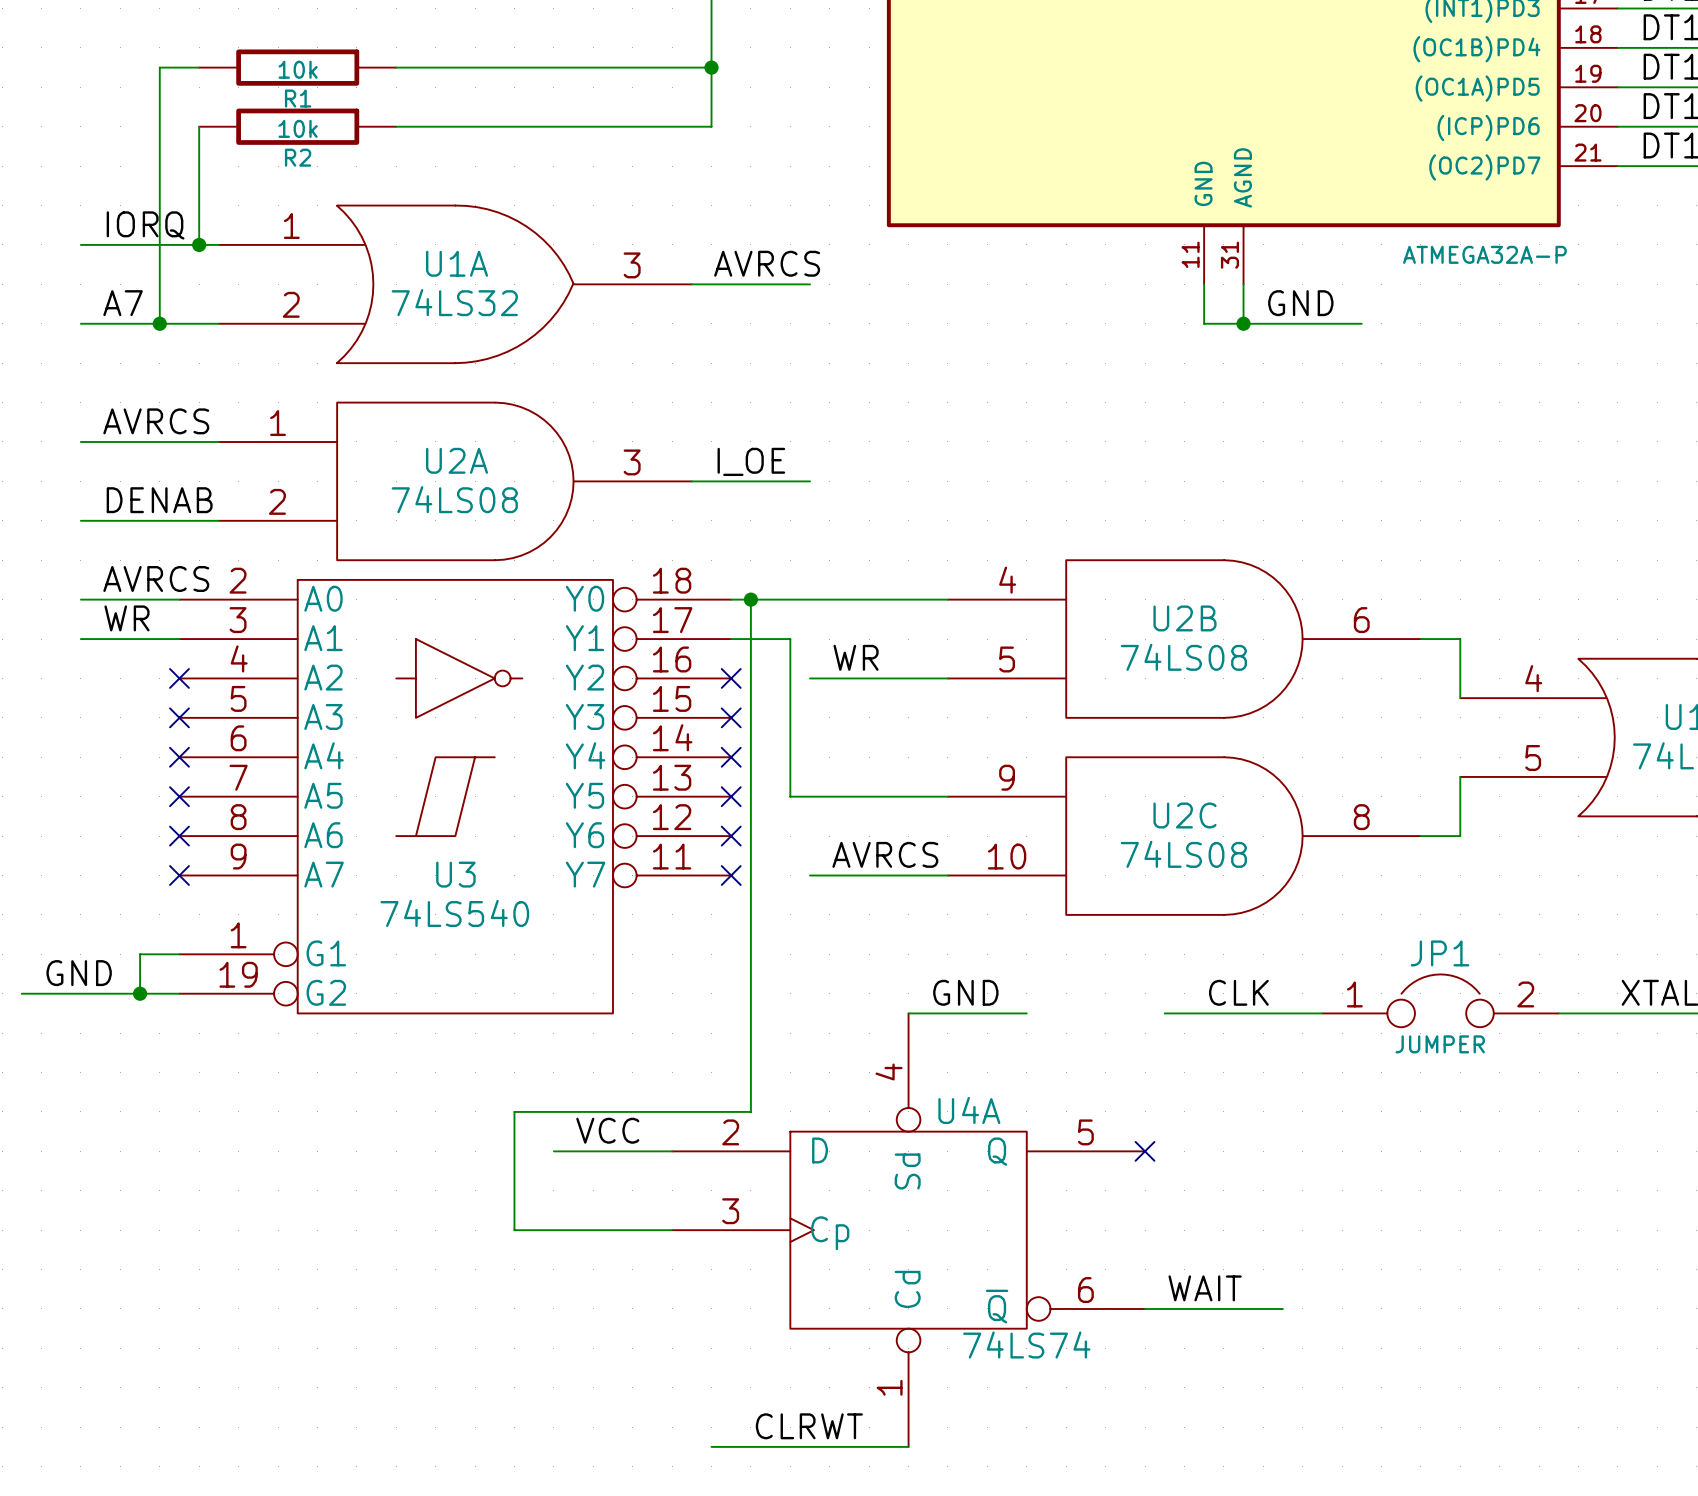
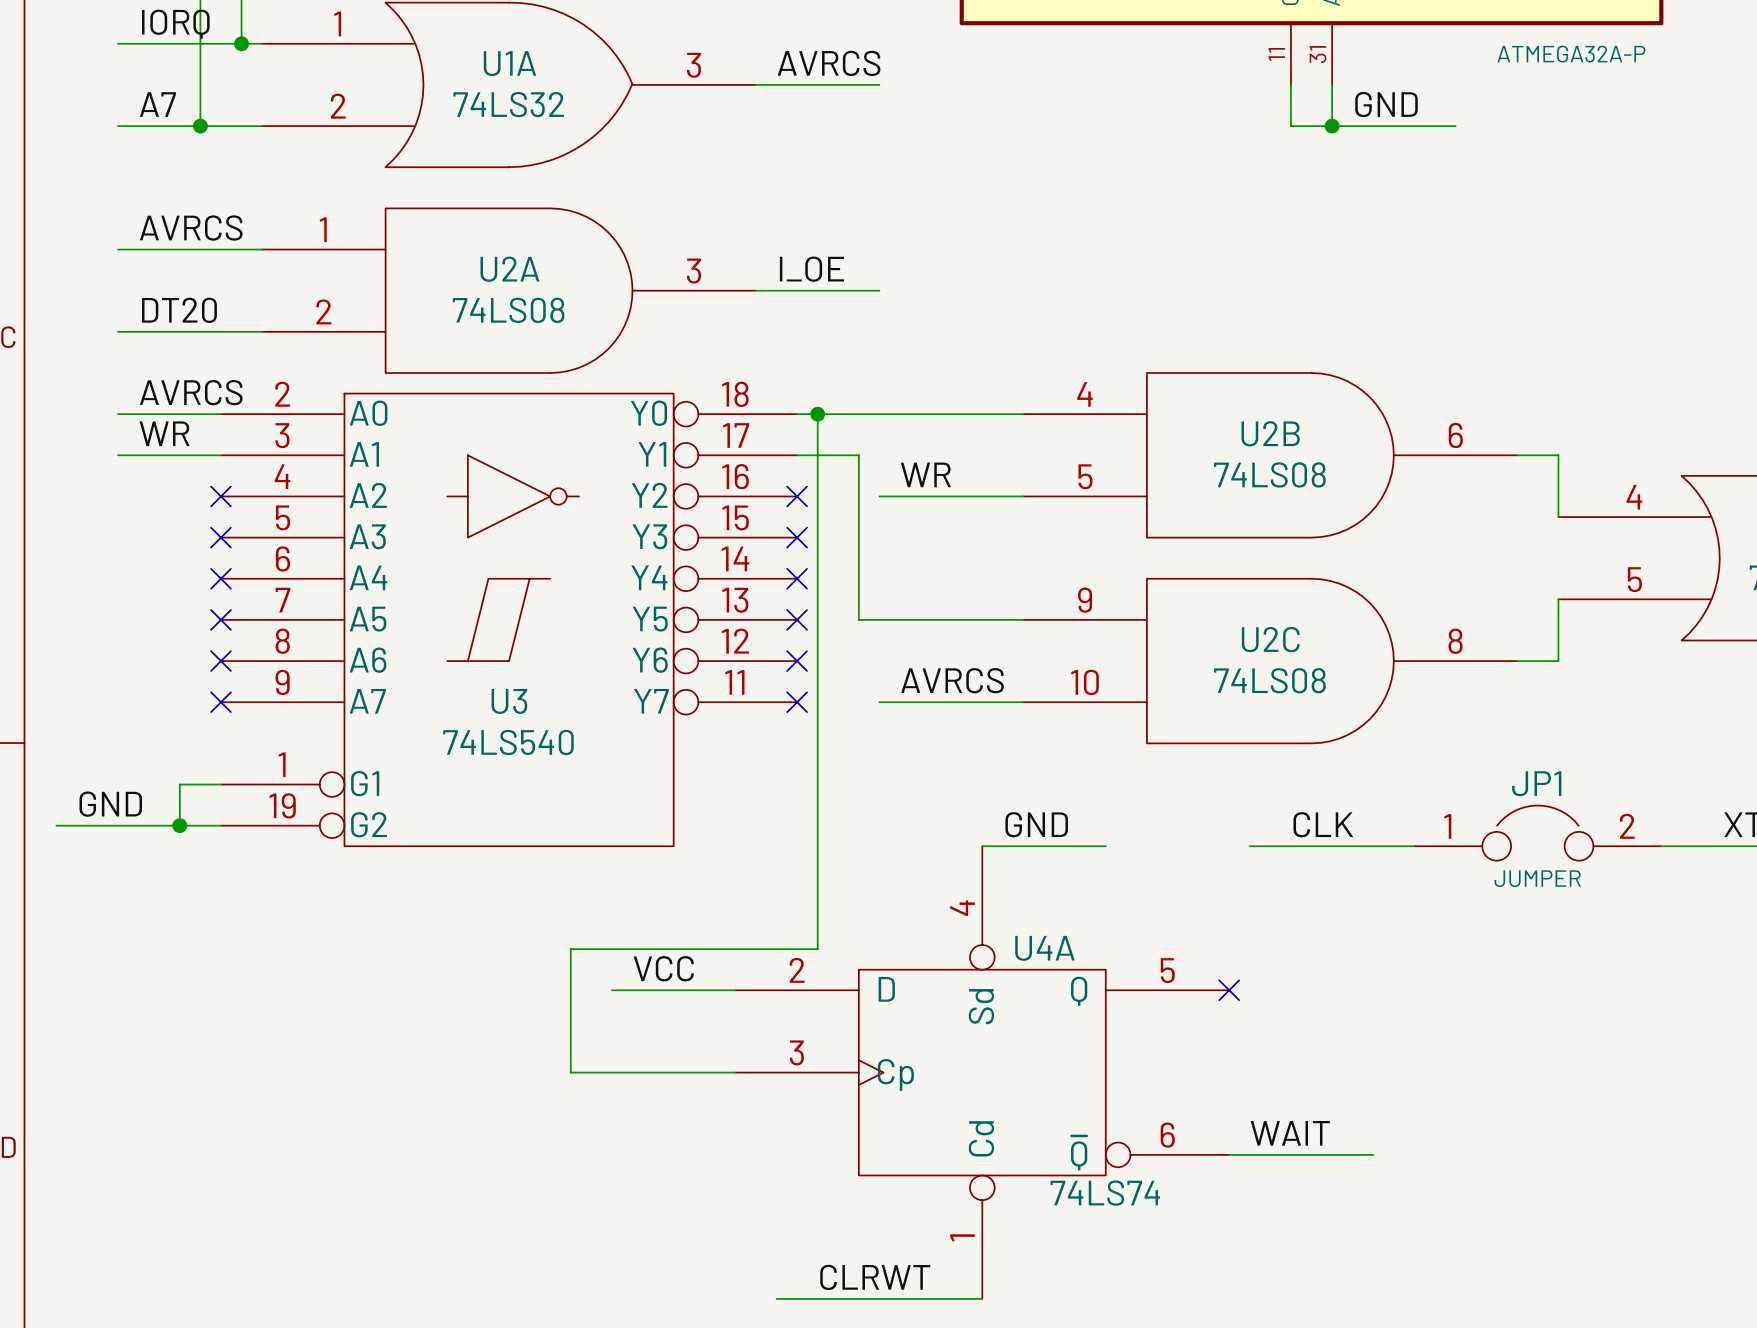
label: DENAB (159, 500) -> DT20 (179, 310)

